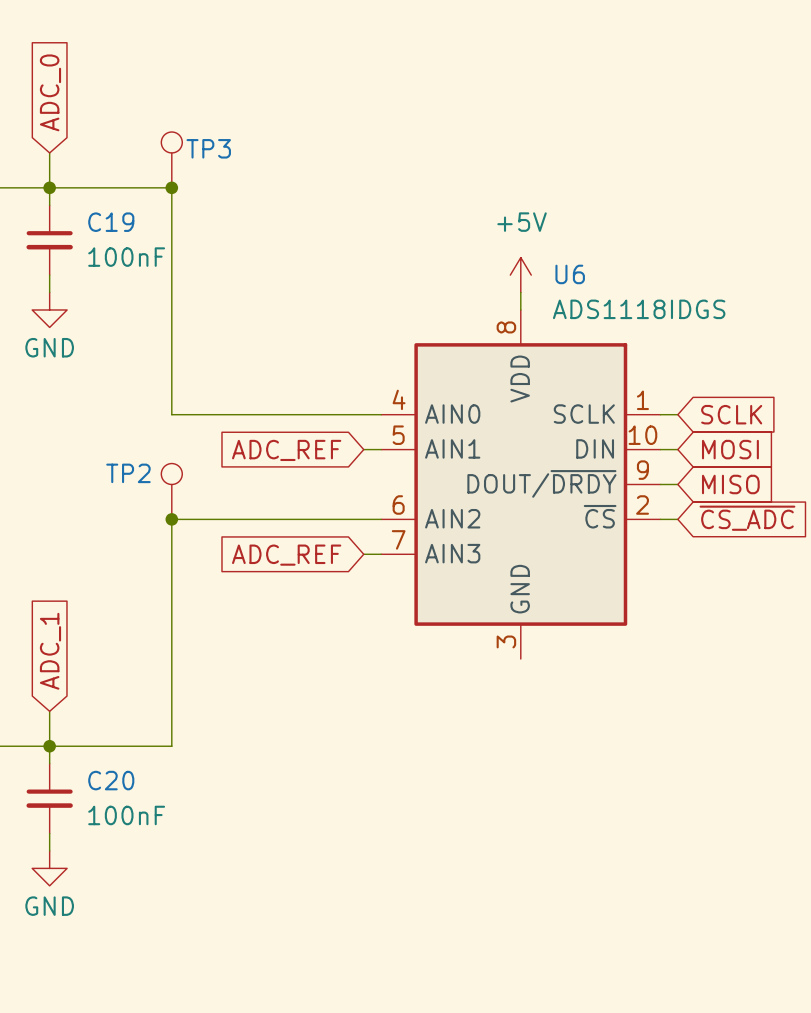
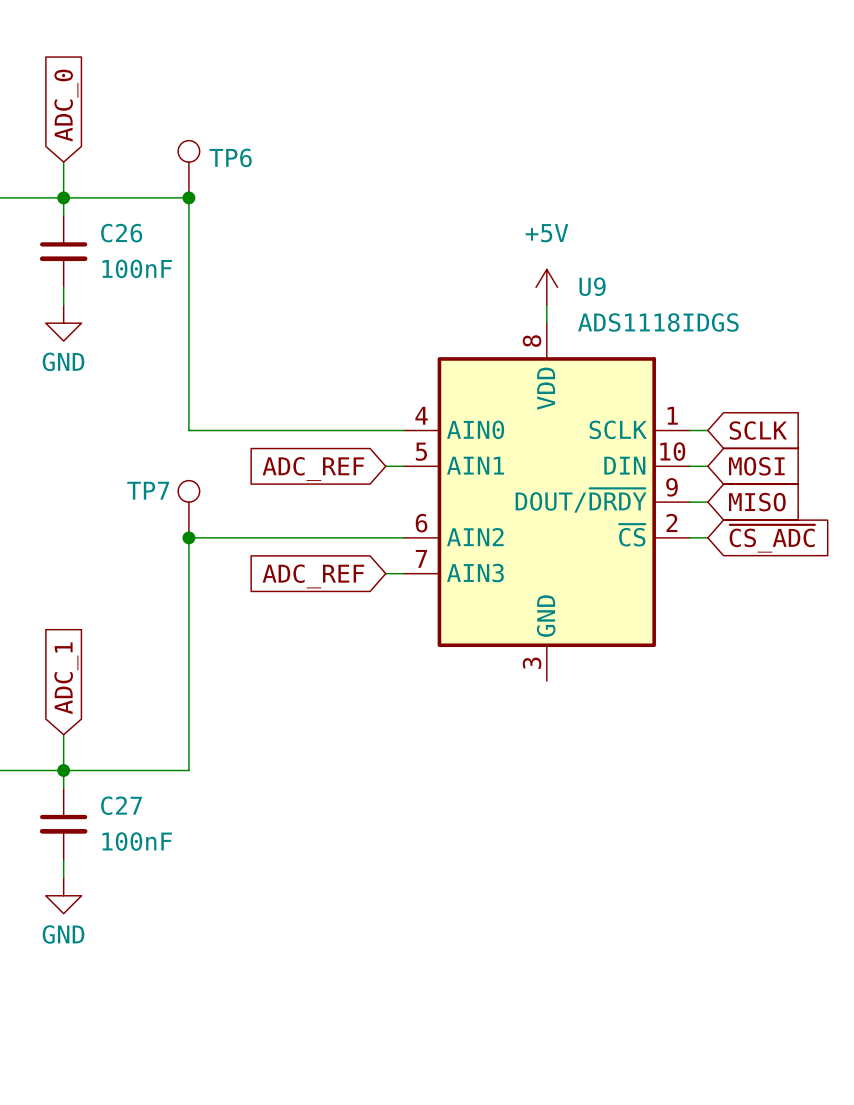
TP3 name: TP3 (208, 148) -> TP6 (230, 157)
C19 name: C19 (111, 222) -> C26 (121, 233)
U6 name: U6 (570, 274) -> U9 (592, 286)
TP2 name: TP2 (128, 473) -> TP7 (148, 490)
C20 name: C20 (111, 780) -> C27 (121, 805)

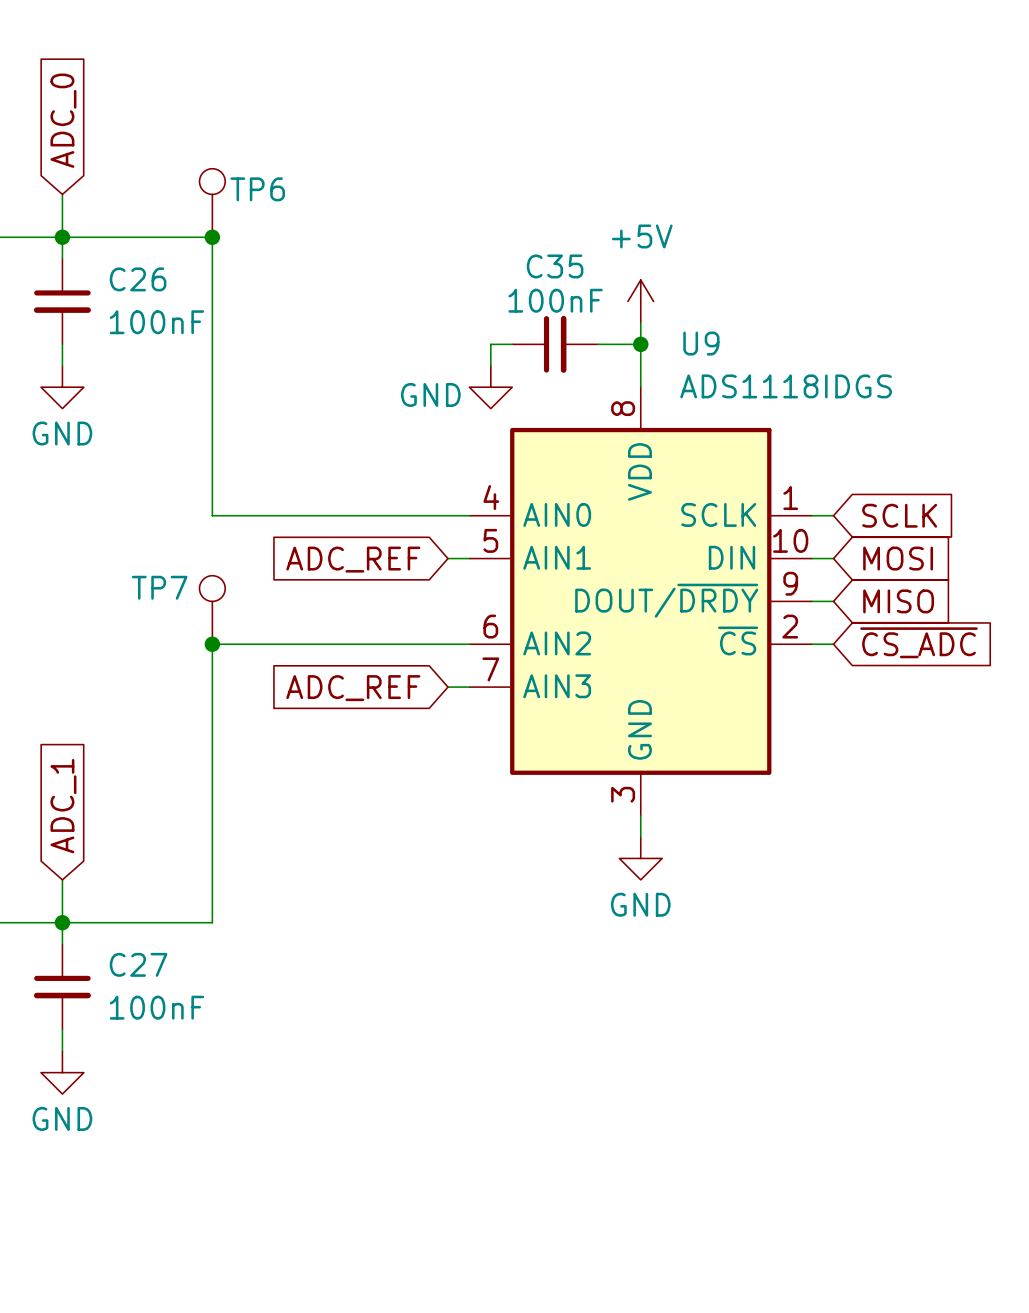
wire: none -> (512, 344) (490, 344) (490, 365)
C35: none -> 100nF (555, 344)
wire: none -> (597, 344) (640, 344)
power symbol position: +5V (546, 287) -> +5V (640, 301)
junction: none -> (640, 344)
power symbol: none -> GND (490, 387)
wire: none -> (640, 815) (640, 837)
power symbol: none -> GND (640, 858)

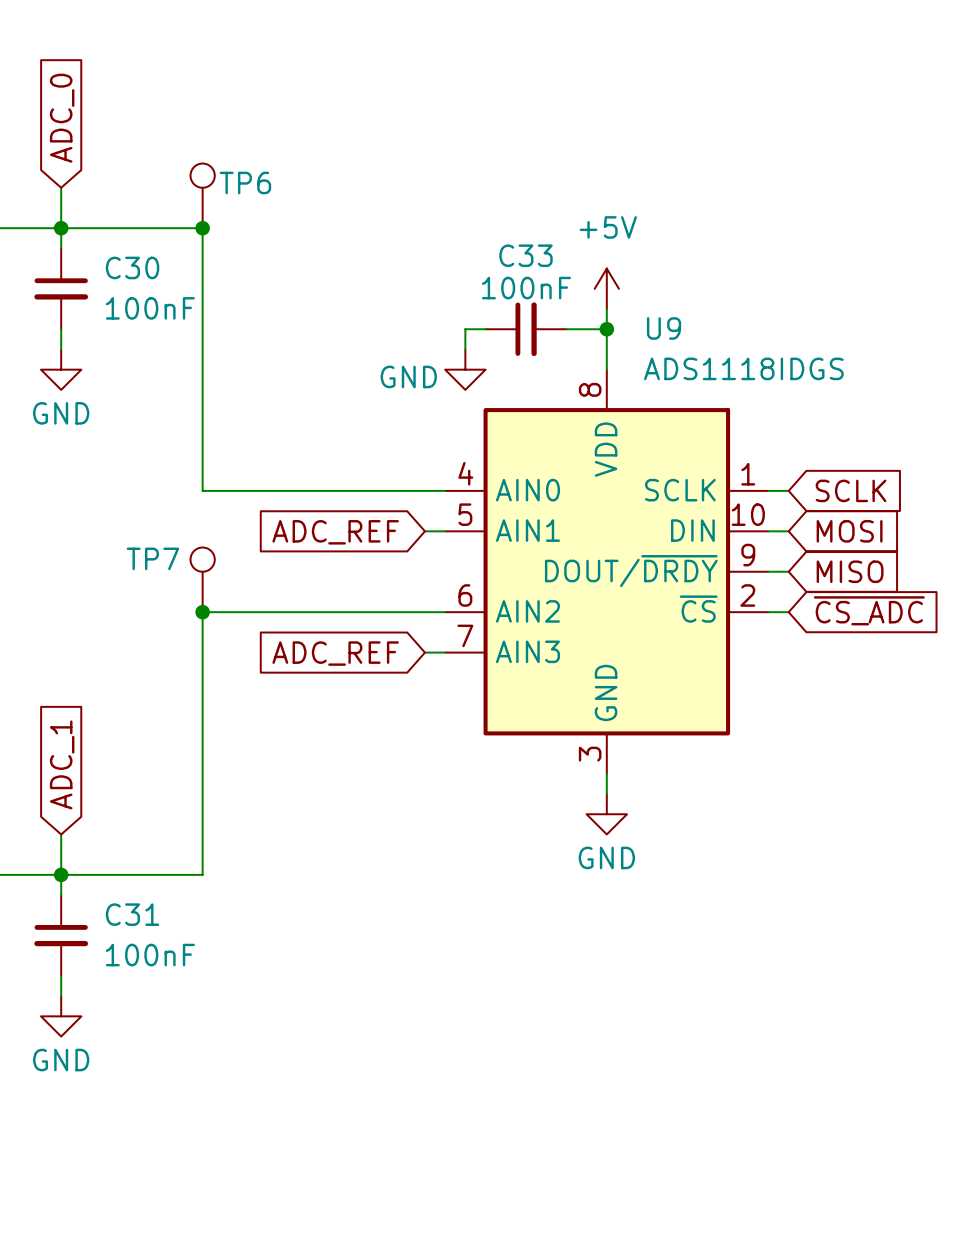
C35 name: C35 (555, 266) -> C33 (525, 255)
C26 name: C26 (138, 279) -> C30 (132, 267)
C27 name: C27 (138, 964) -> C31 (132, 914)

